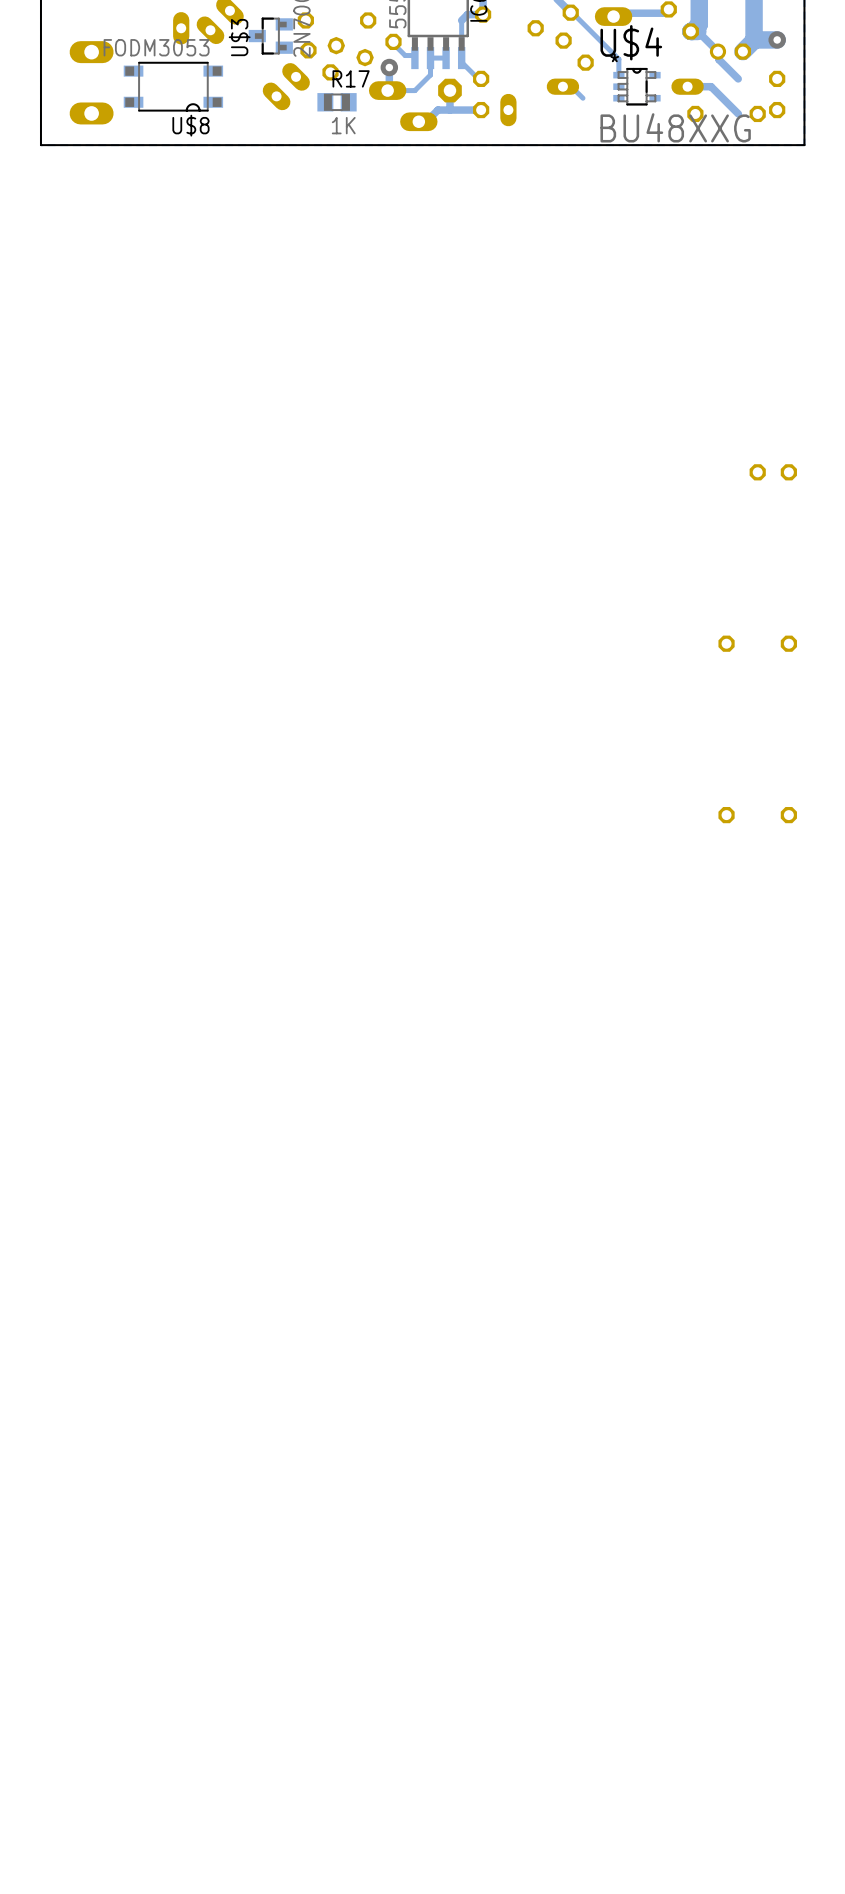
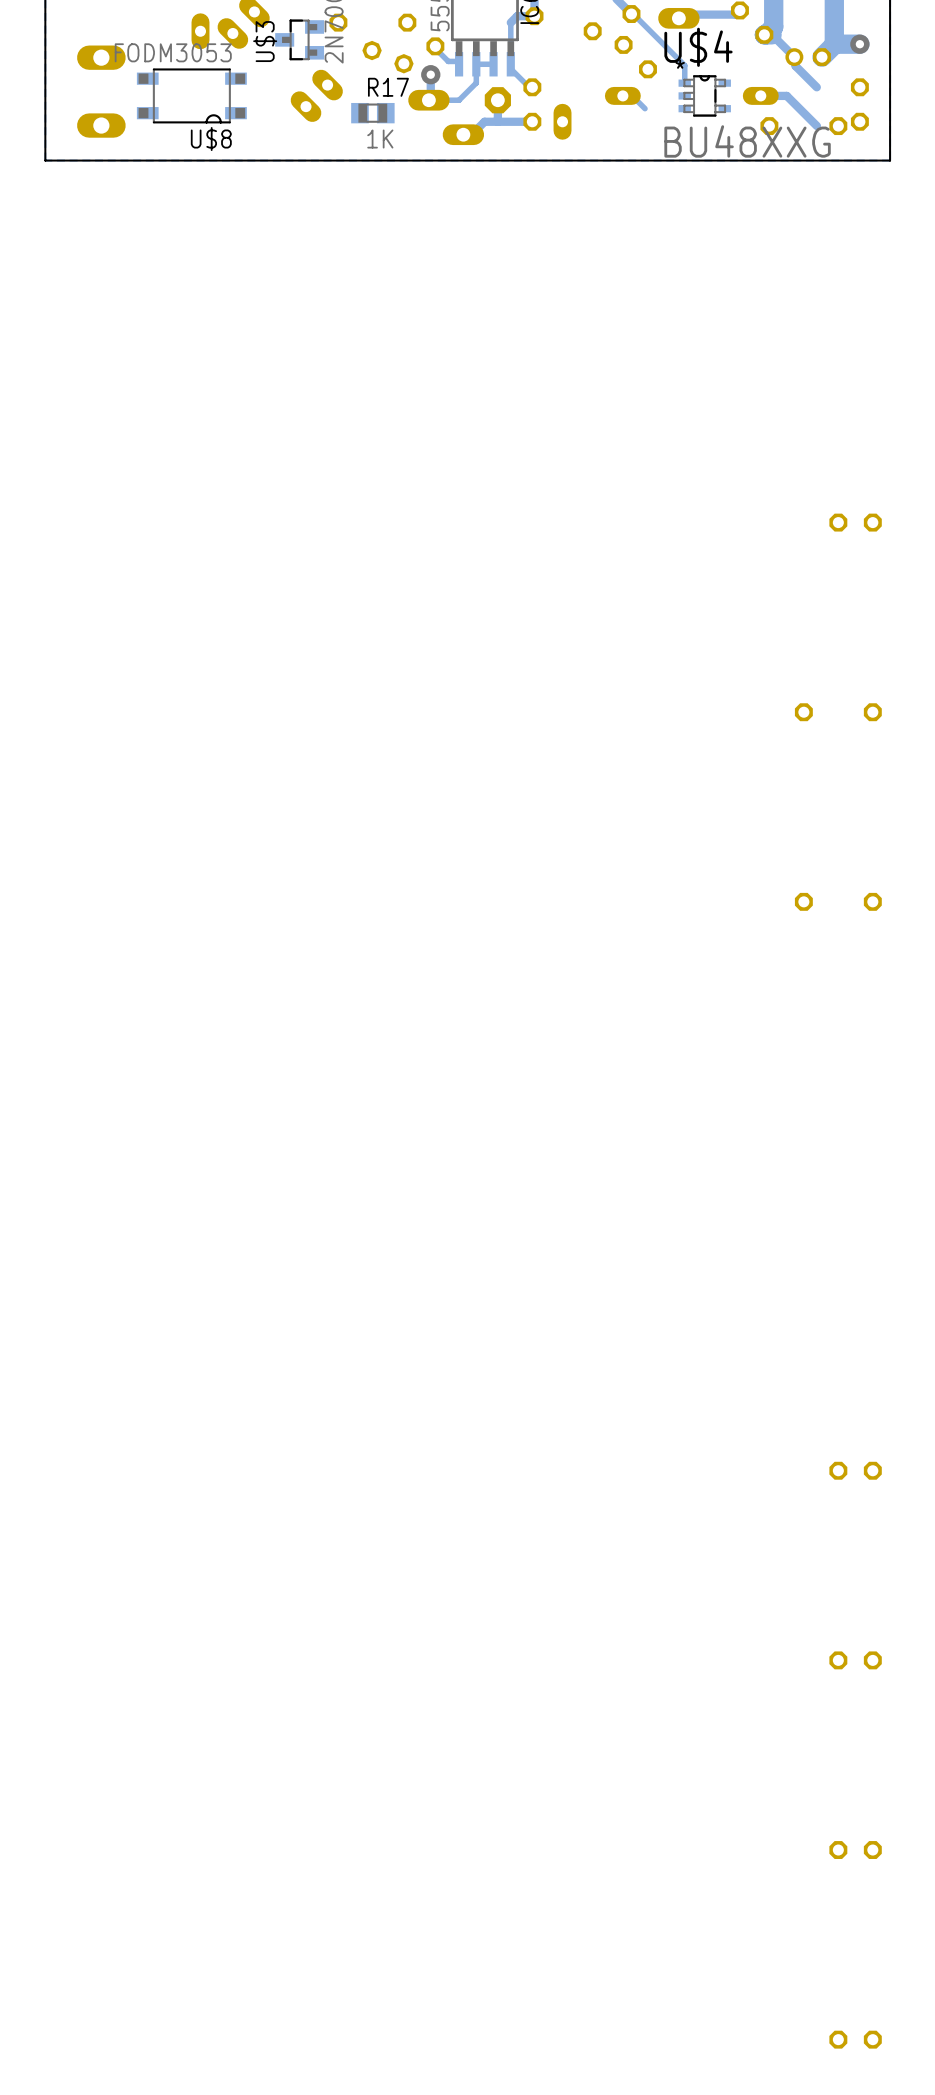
part: (319, 61) -> none
part: none -> (855, 1470)
part: none -> (855, 1660)
part: none -> (855, 1850)
part: none -> (855, 2039)

